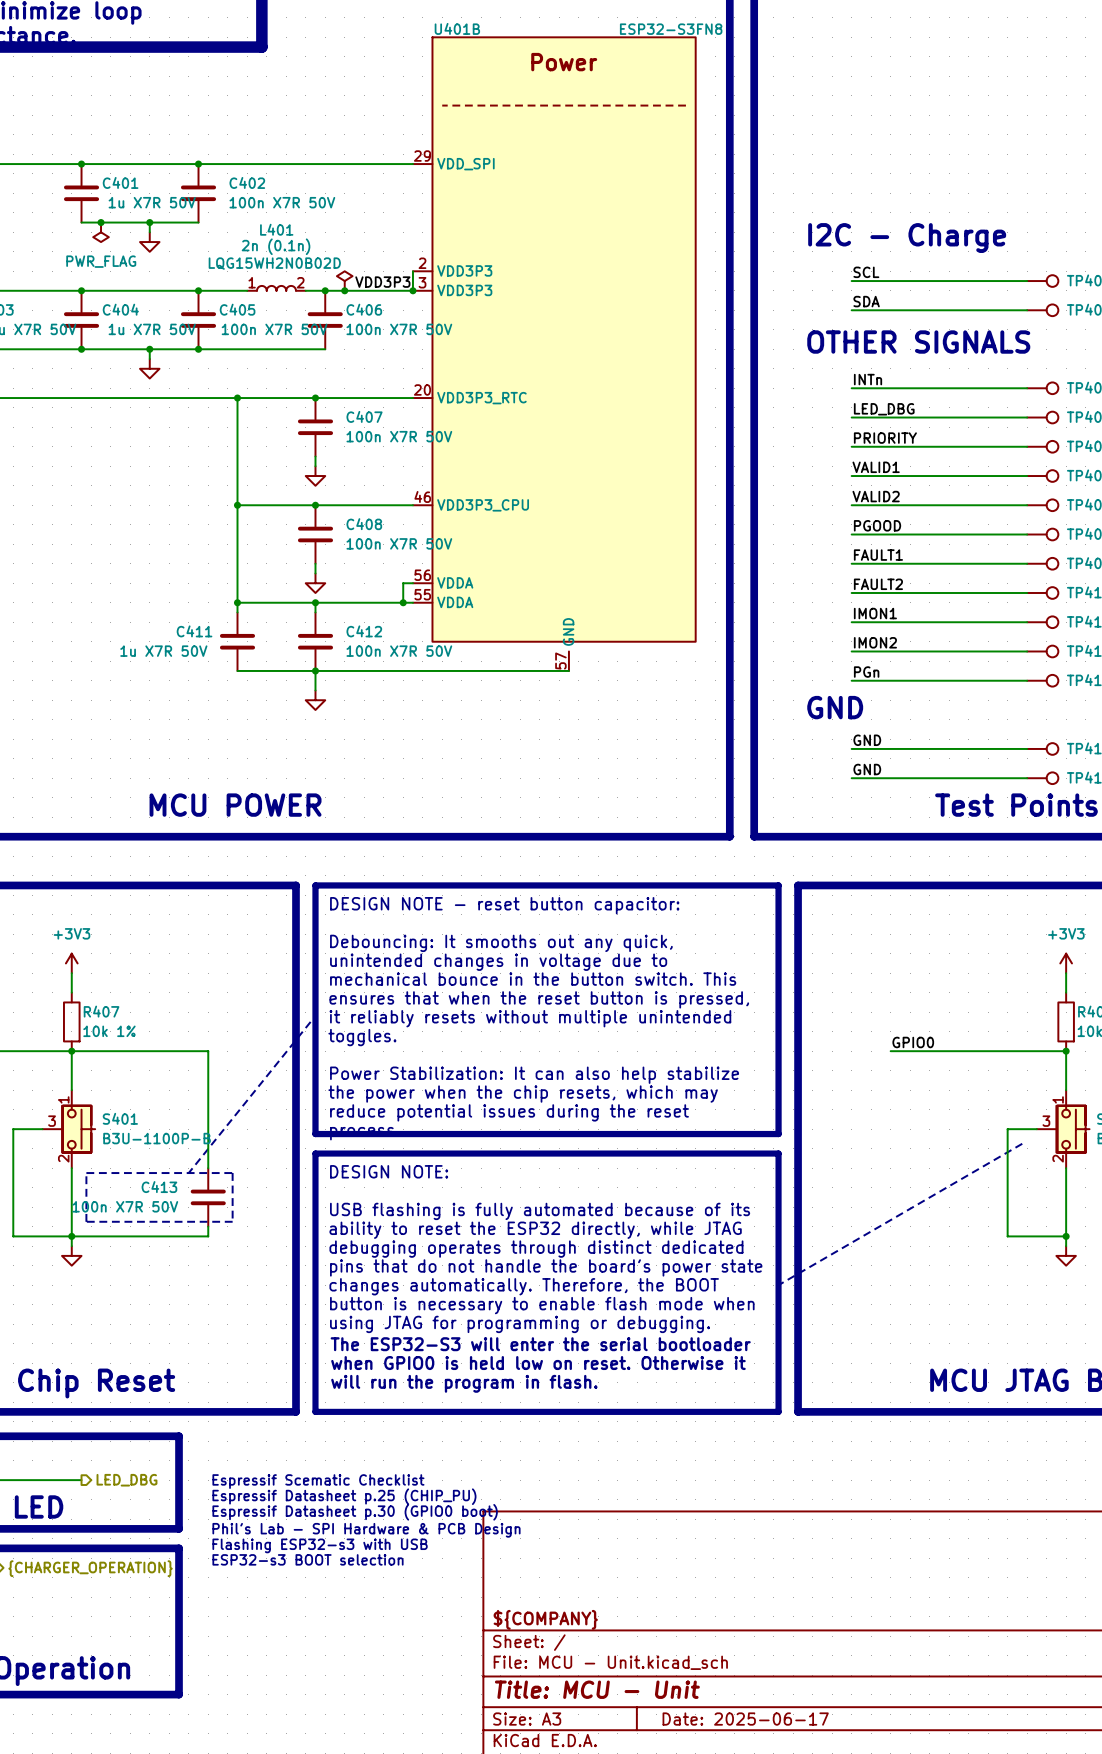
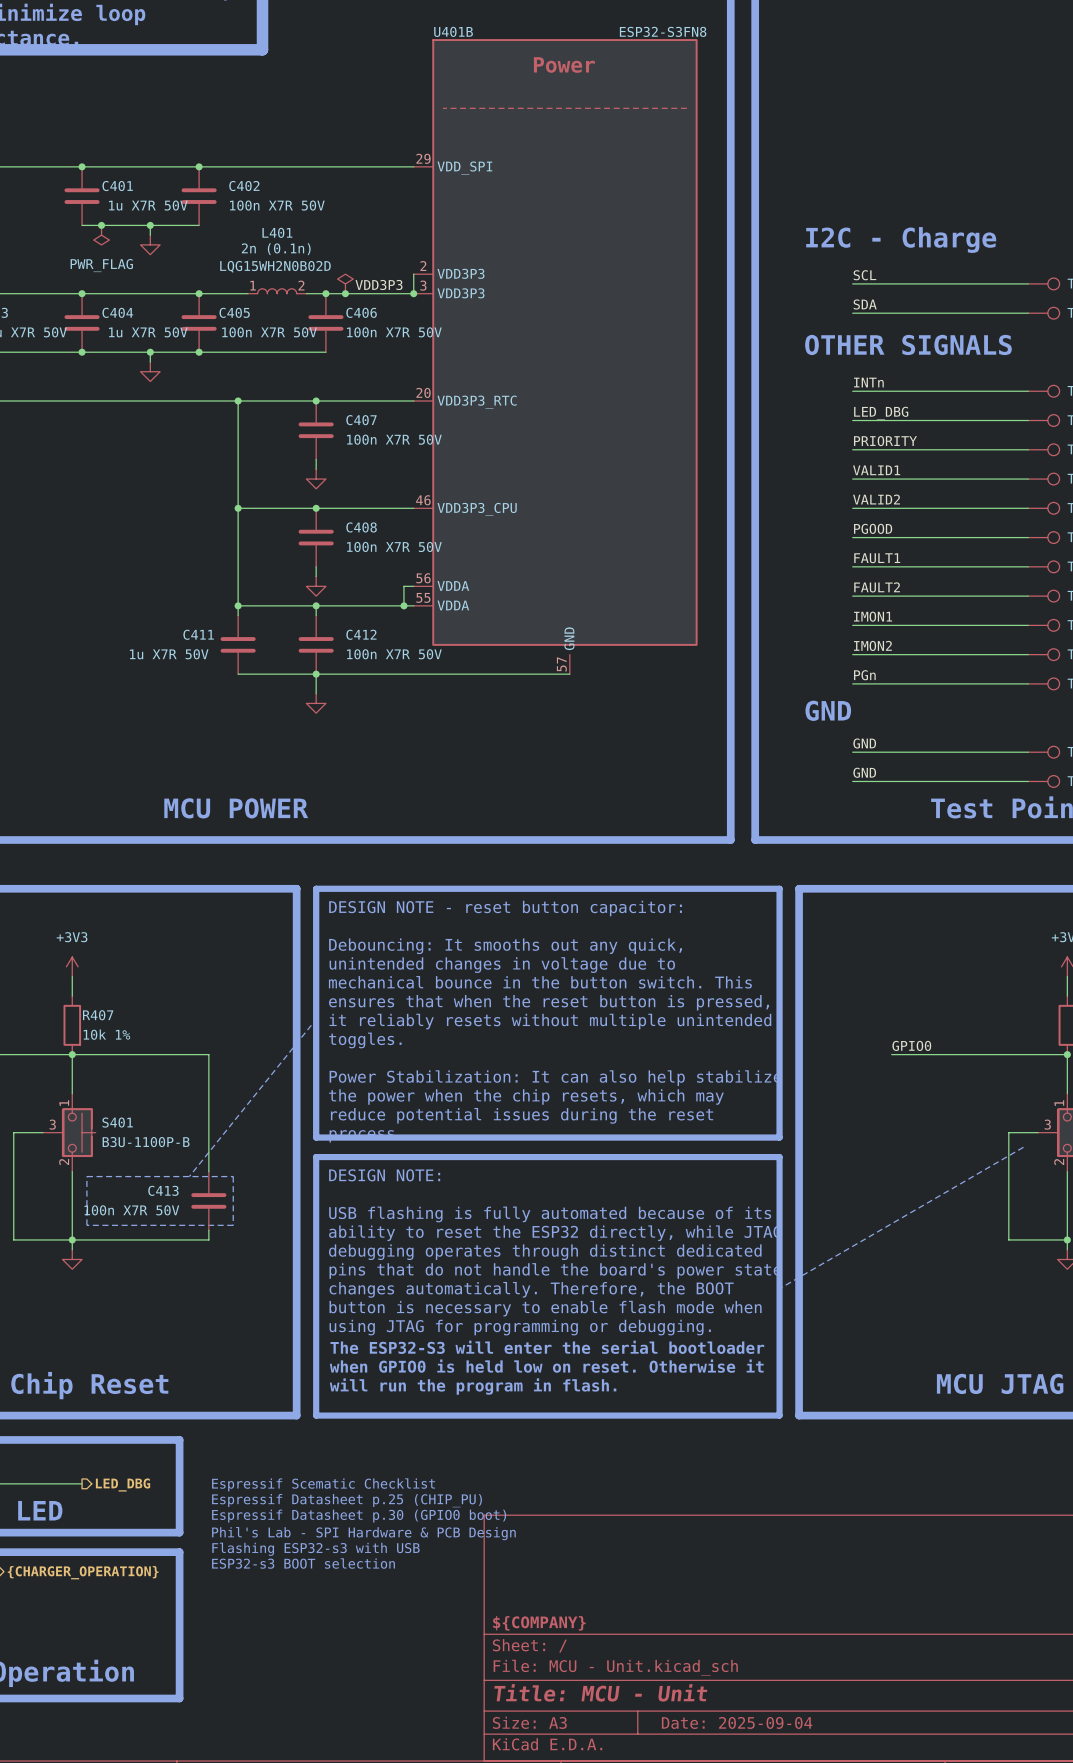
title block: Date: 2025-06-17 (745, 1719) -> Date: 2025-09-04 (737, 1722)

